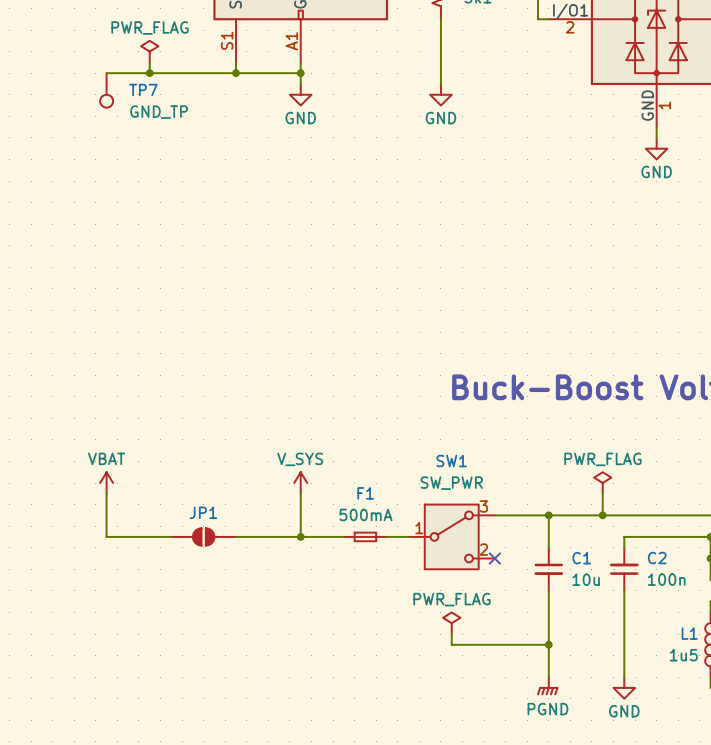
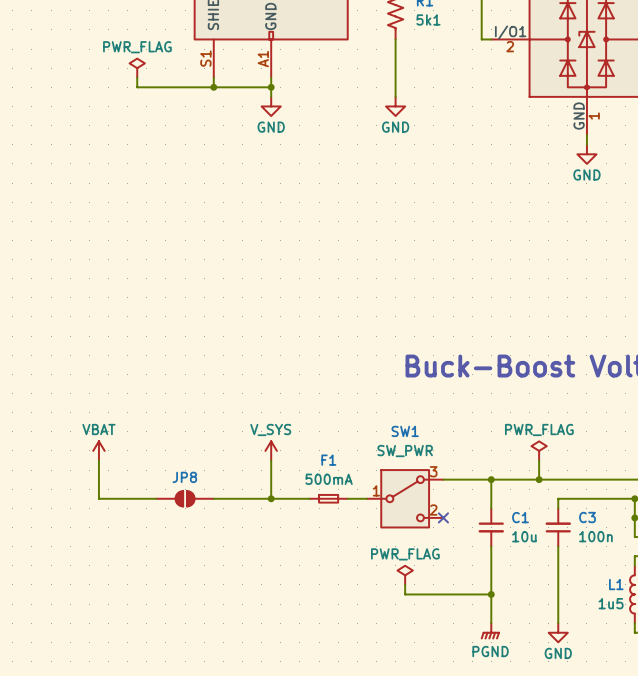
wire: (106, 73) (149, 73) -> none
junction: (149, 73) -> none
TP7: GND_TP (106, 90) -> none
JP1 name: JP1 (203, 512) -> JP8 (184, 477)
C2 name: C2 (657, 558) -> C3 (587, 517)

